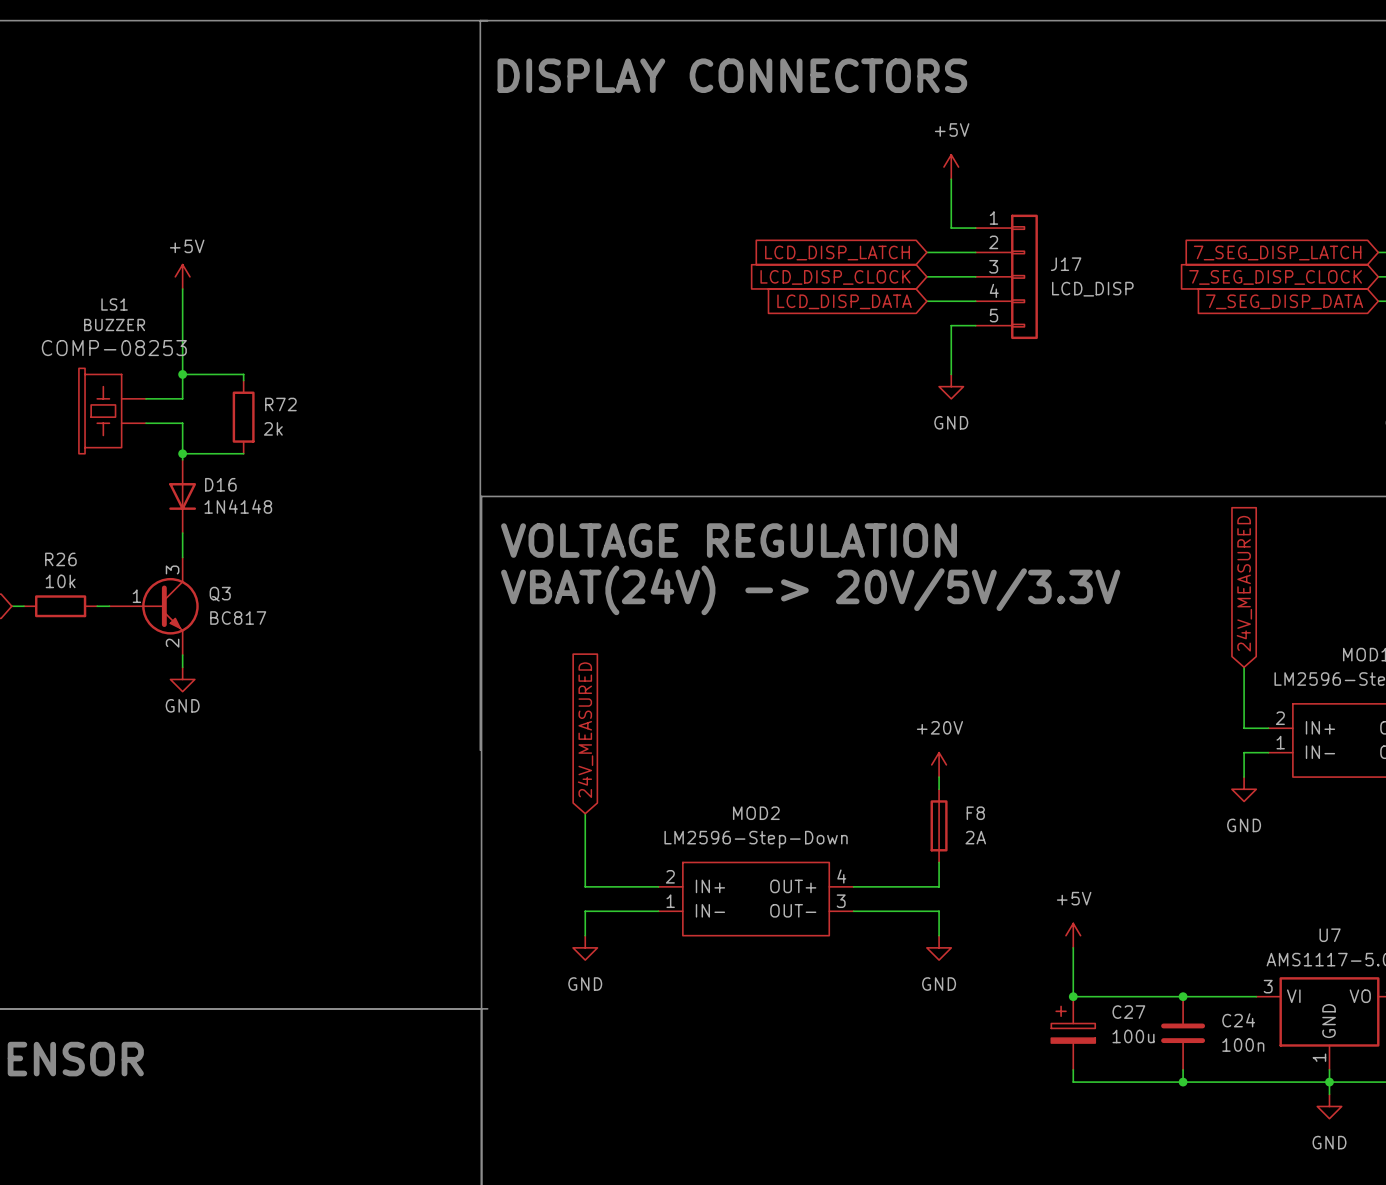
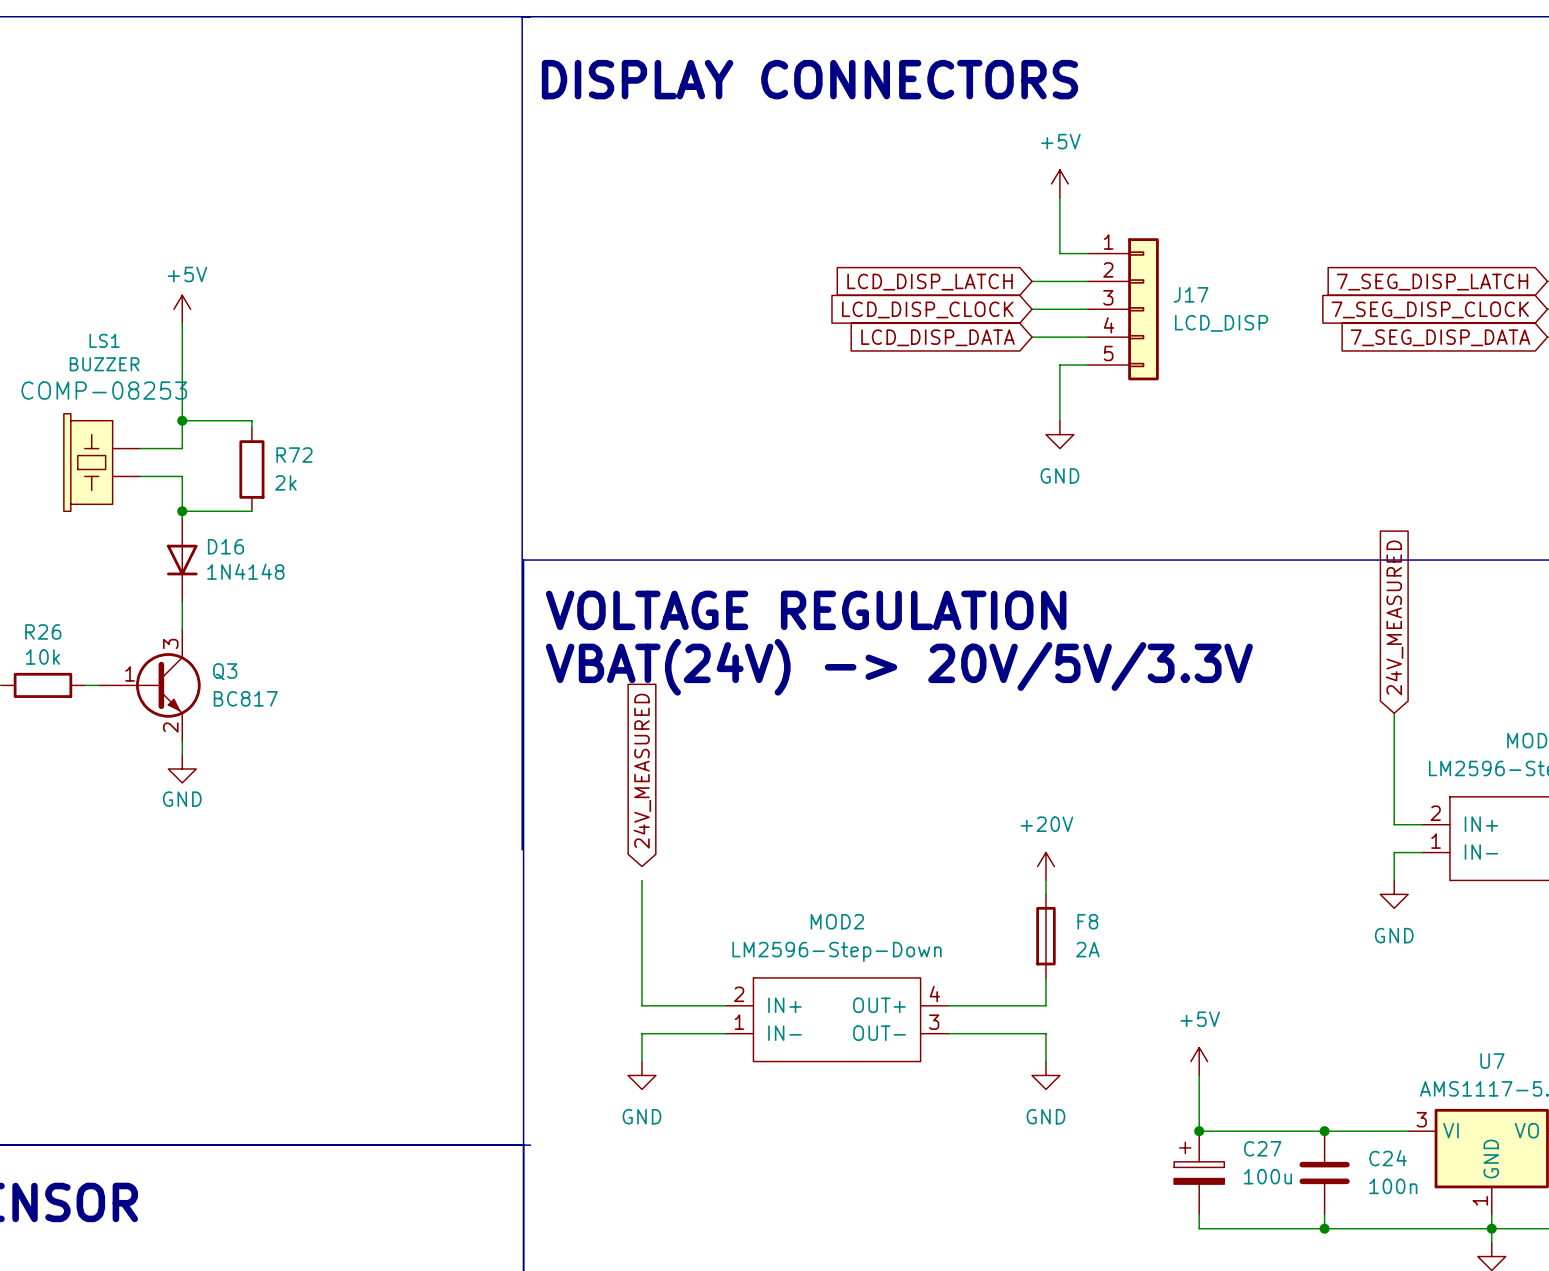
global label position: 24V_MEASURED (1244, 583) -> 24V_MEASURED (1394, 617)
wire: none -> (1394, 713) (1394, 755)
global label position: 24V_MEASURED (585, 730) -> 24V_MEASURED (642, 771)
wire: none -> (641, 880) (641, 922)

